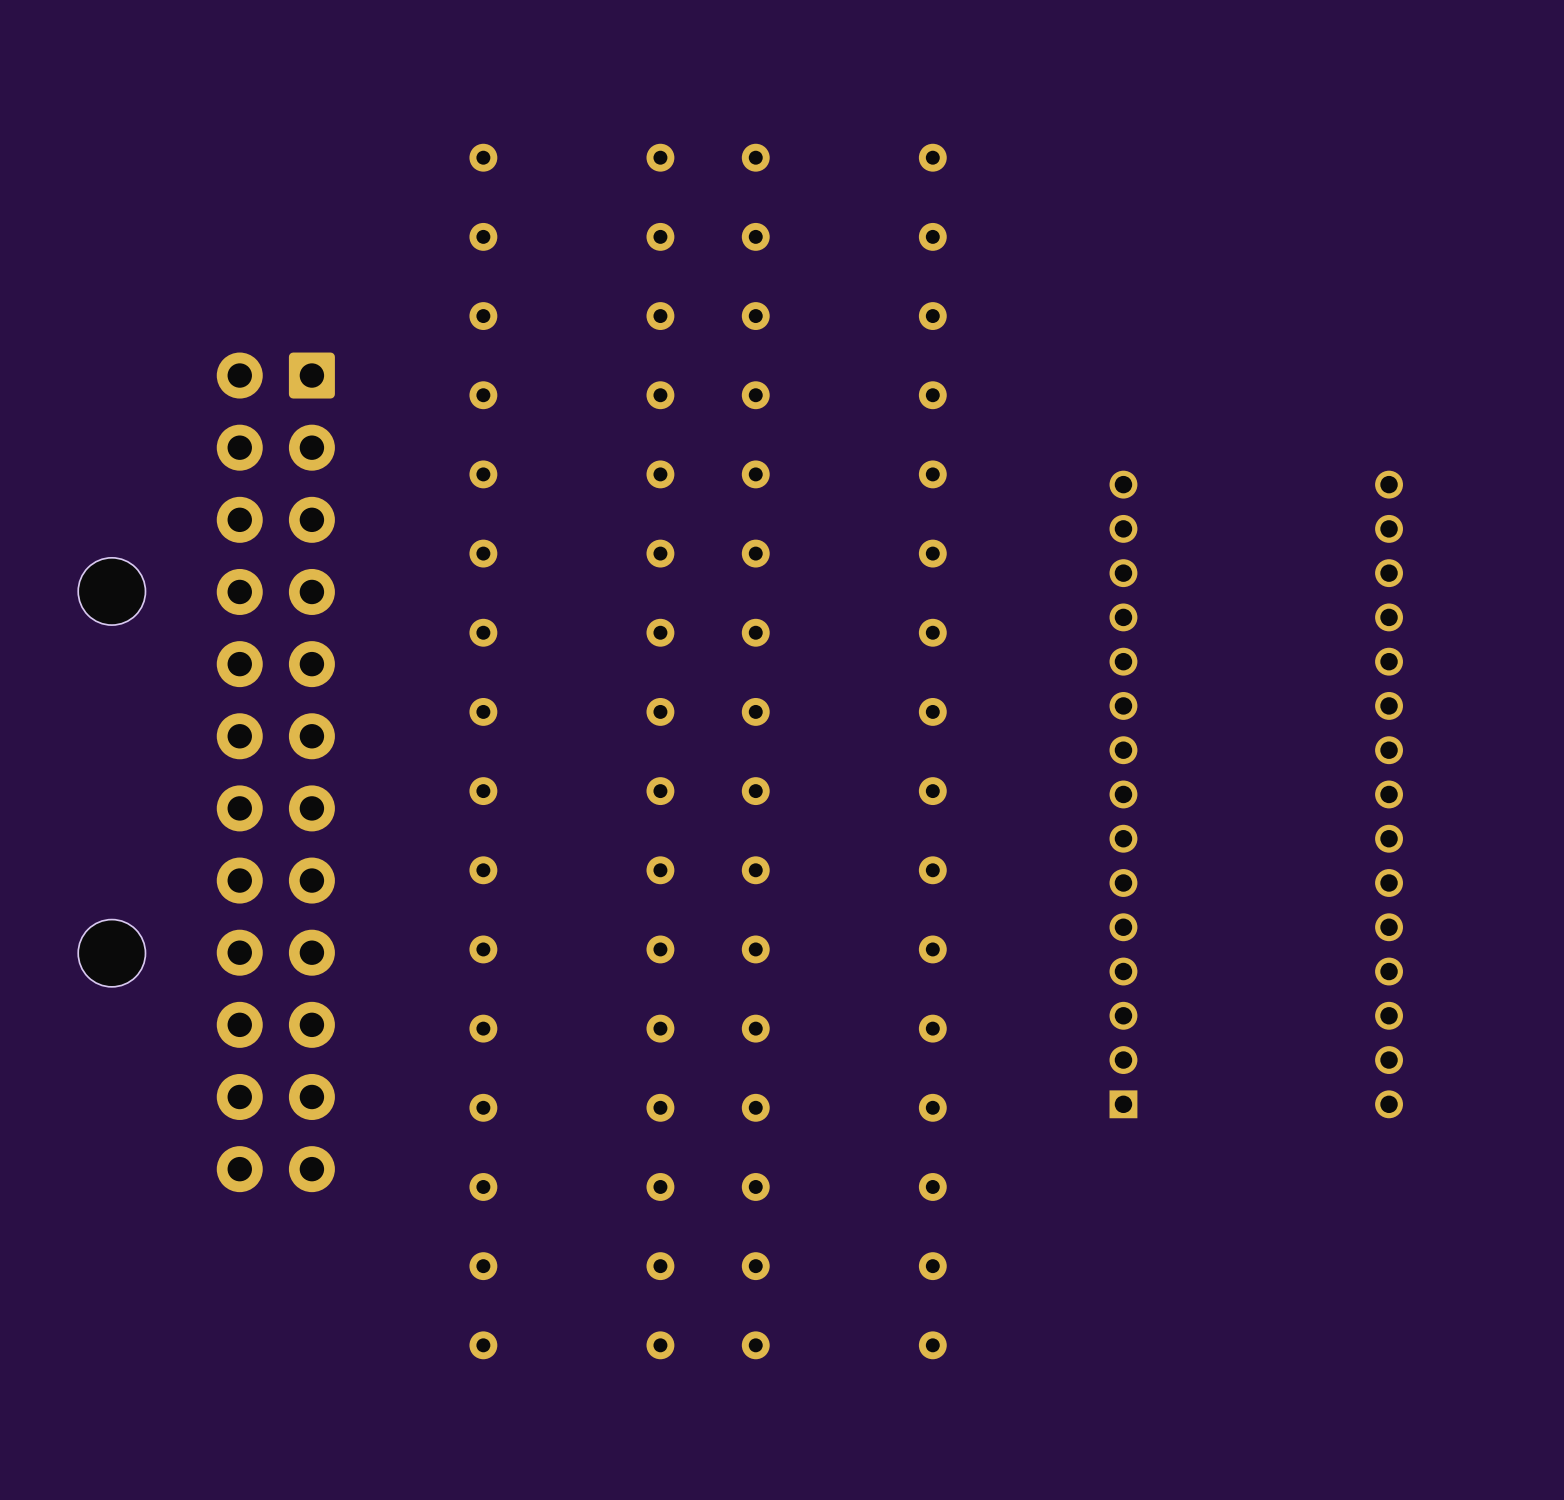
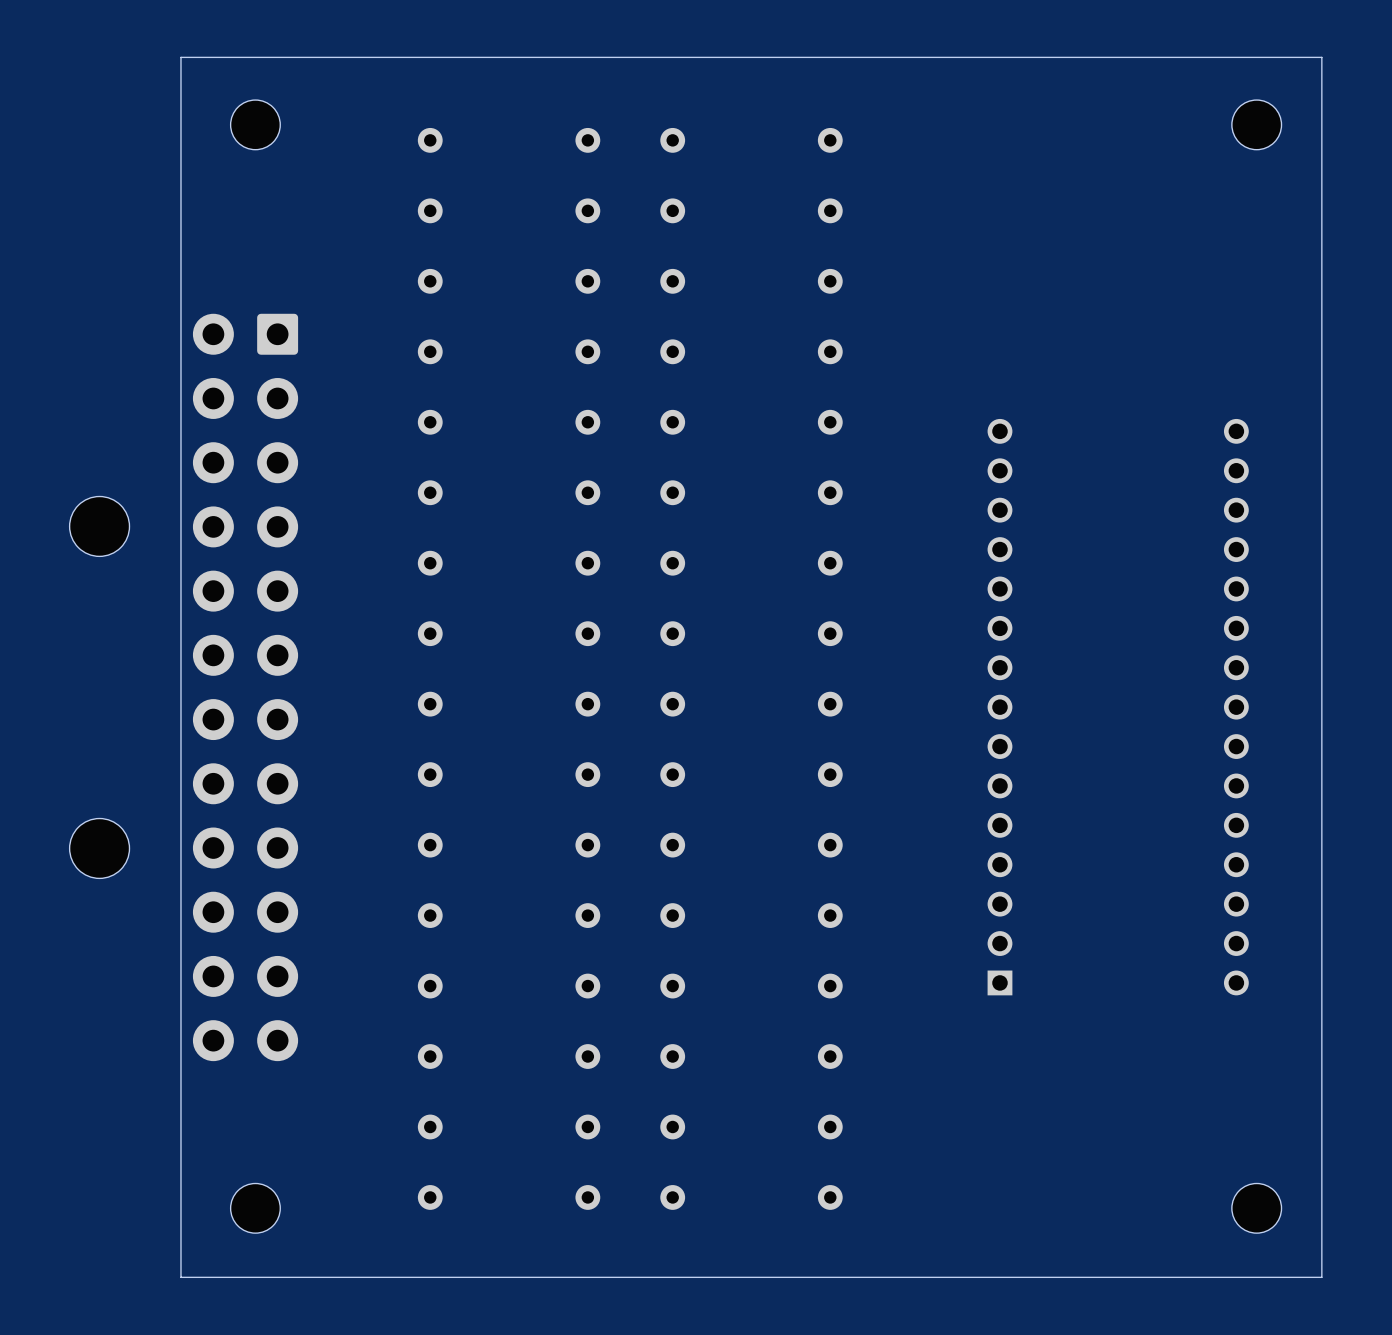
board edge: none -> (1321, 57) (180, 57) (180, 1277) (1321, 1277) (1321, 57)
part: none -> (255, 124)
part: none -> (1256, 124)
part: none -> (255, 1208)
part: none -> (1256, 1208)

